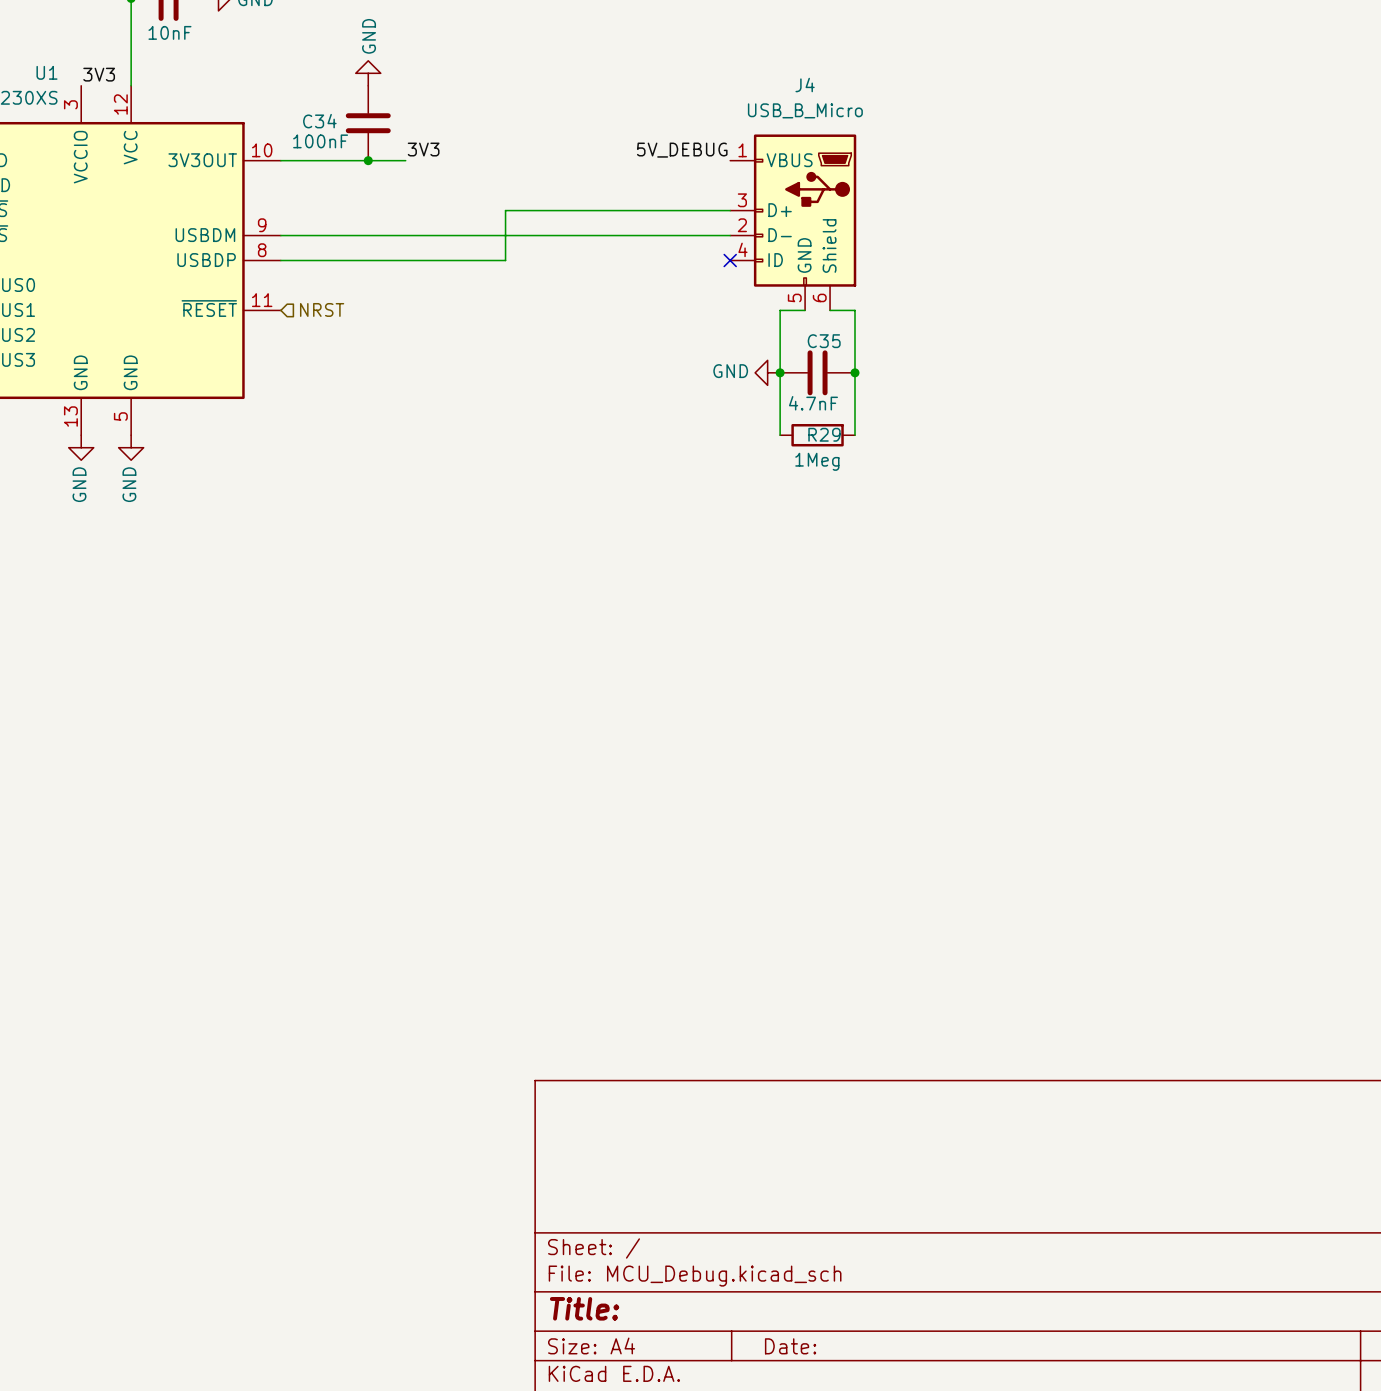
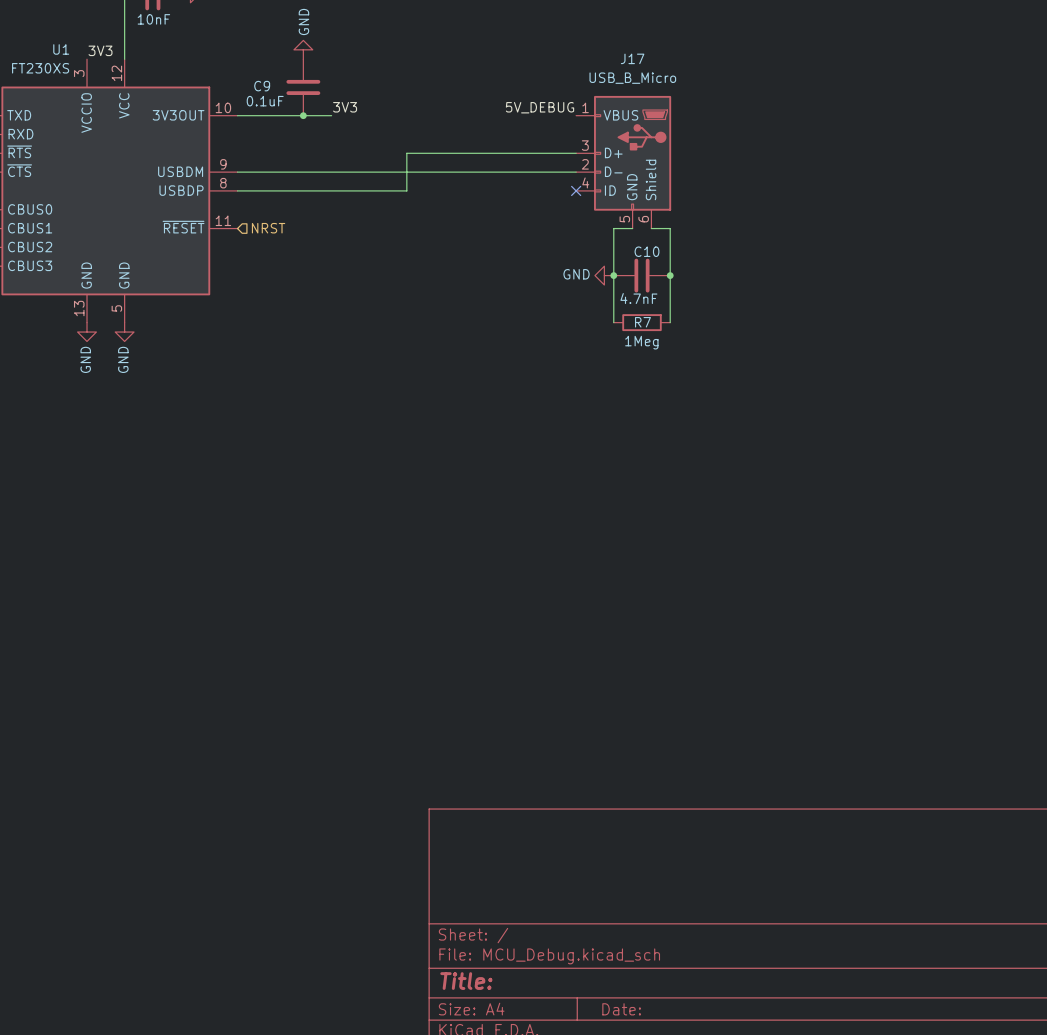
J4 name: J4 (805, 85) -> J17 (632, 58)
C34 name: C34 (319, 121) -> C9 (262, 86)
C34 value: 100nF (320, 141) -> 0.1uF (265, 101)
C35 name: C35 (824, 341) -> C10 (646, 251)
R29 name: R29 (824, 434) -> R7 (642, 322)

